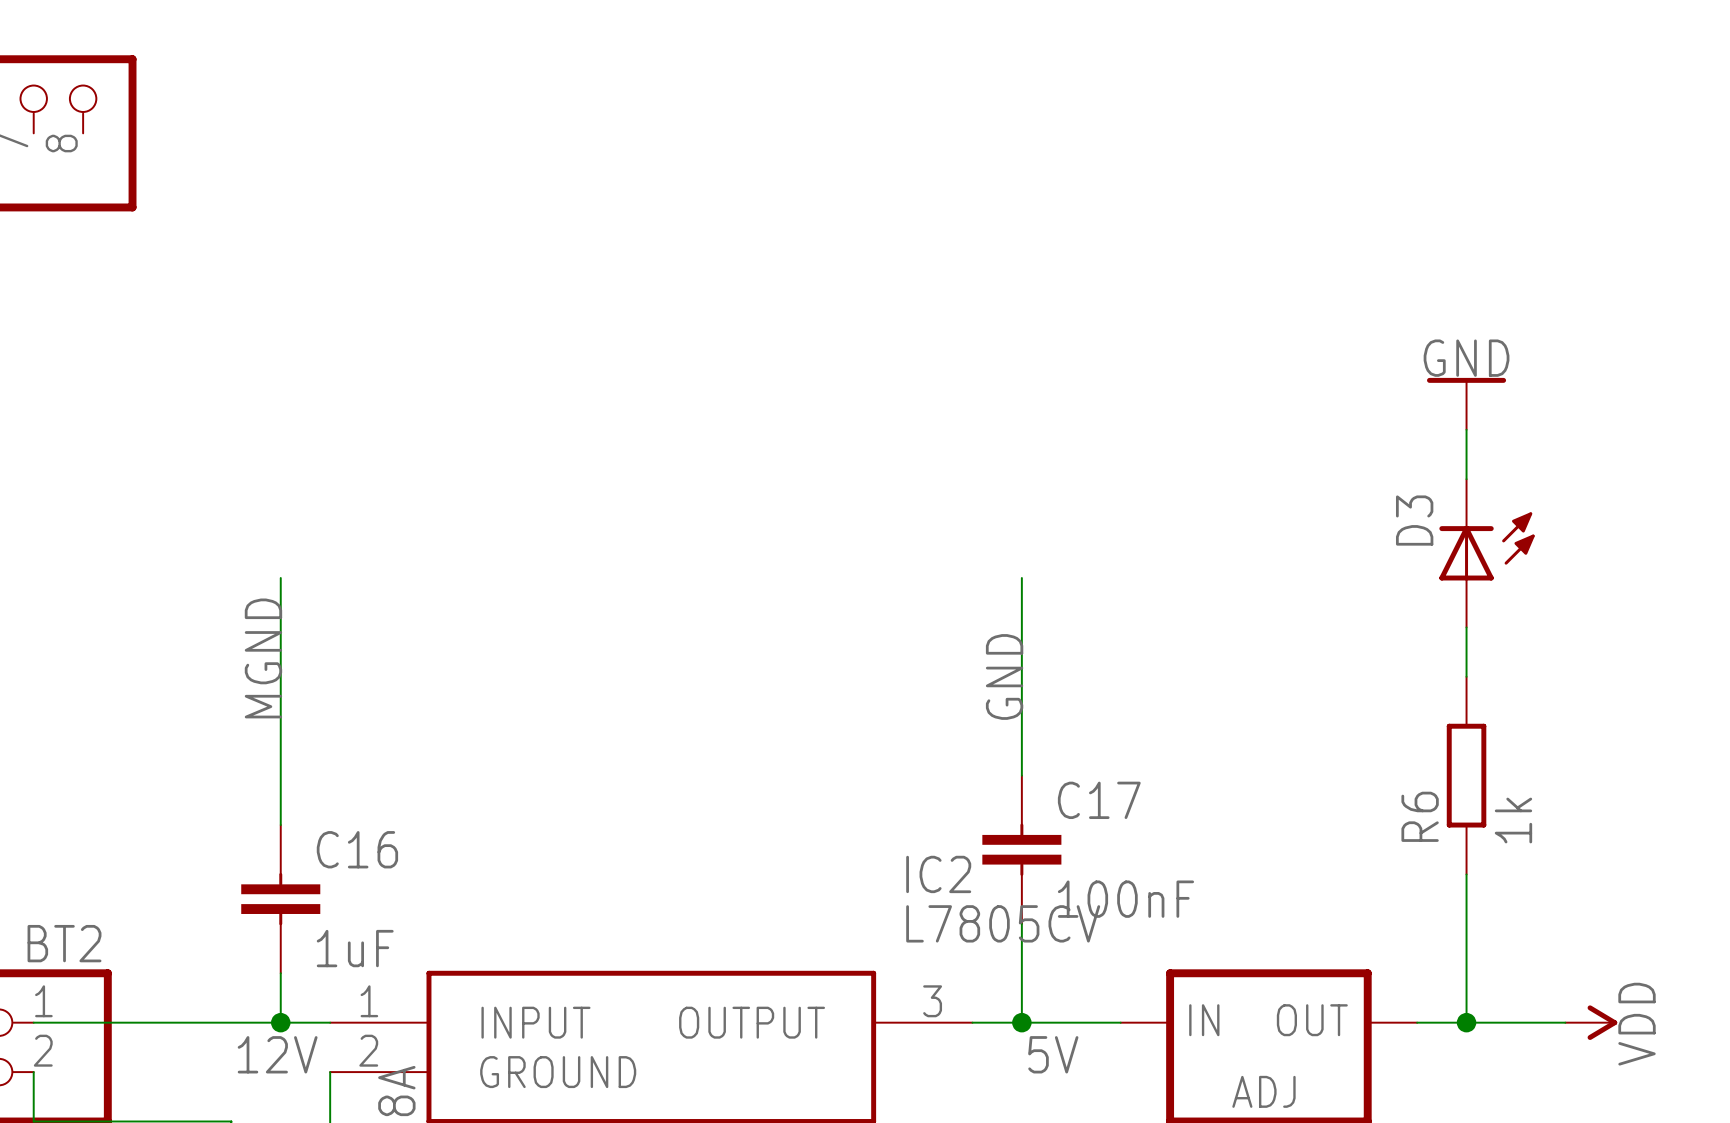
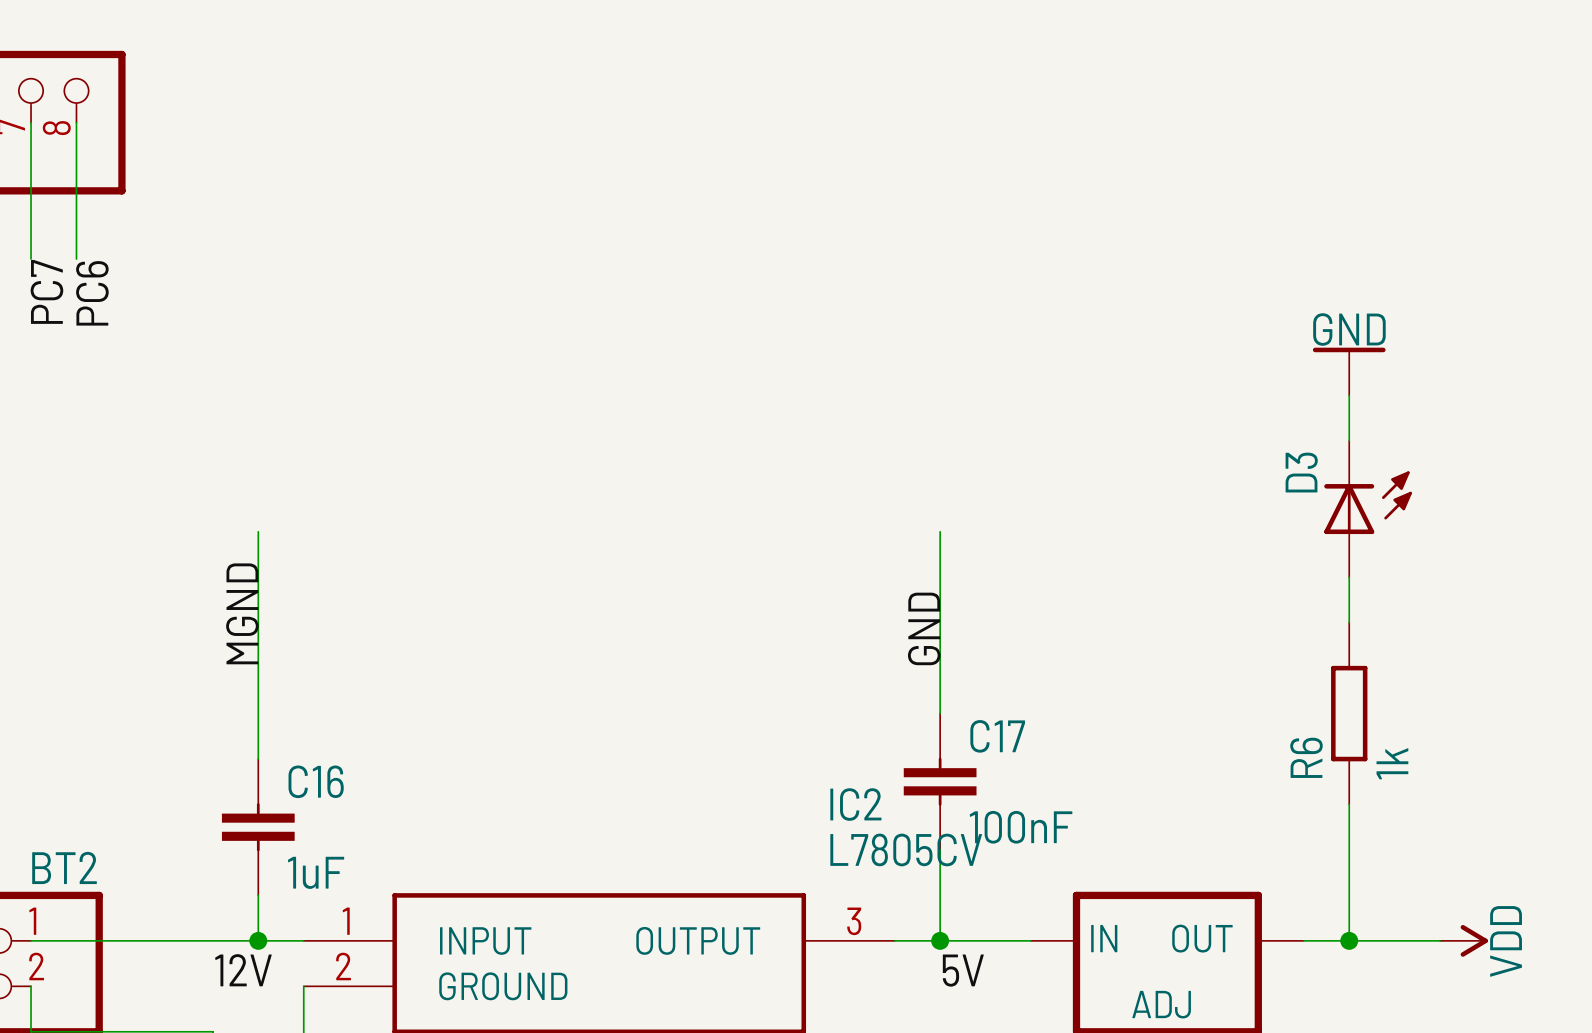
wire: none -> (31, 122) (31, 259)
wire: none -> (76, 122) (76, 259)
label: none -> PC7 (46, 291)
label: none -> PC6 (92, 293)

